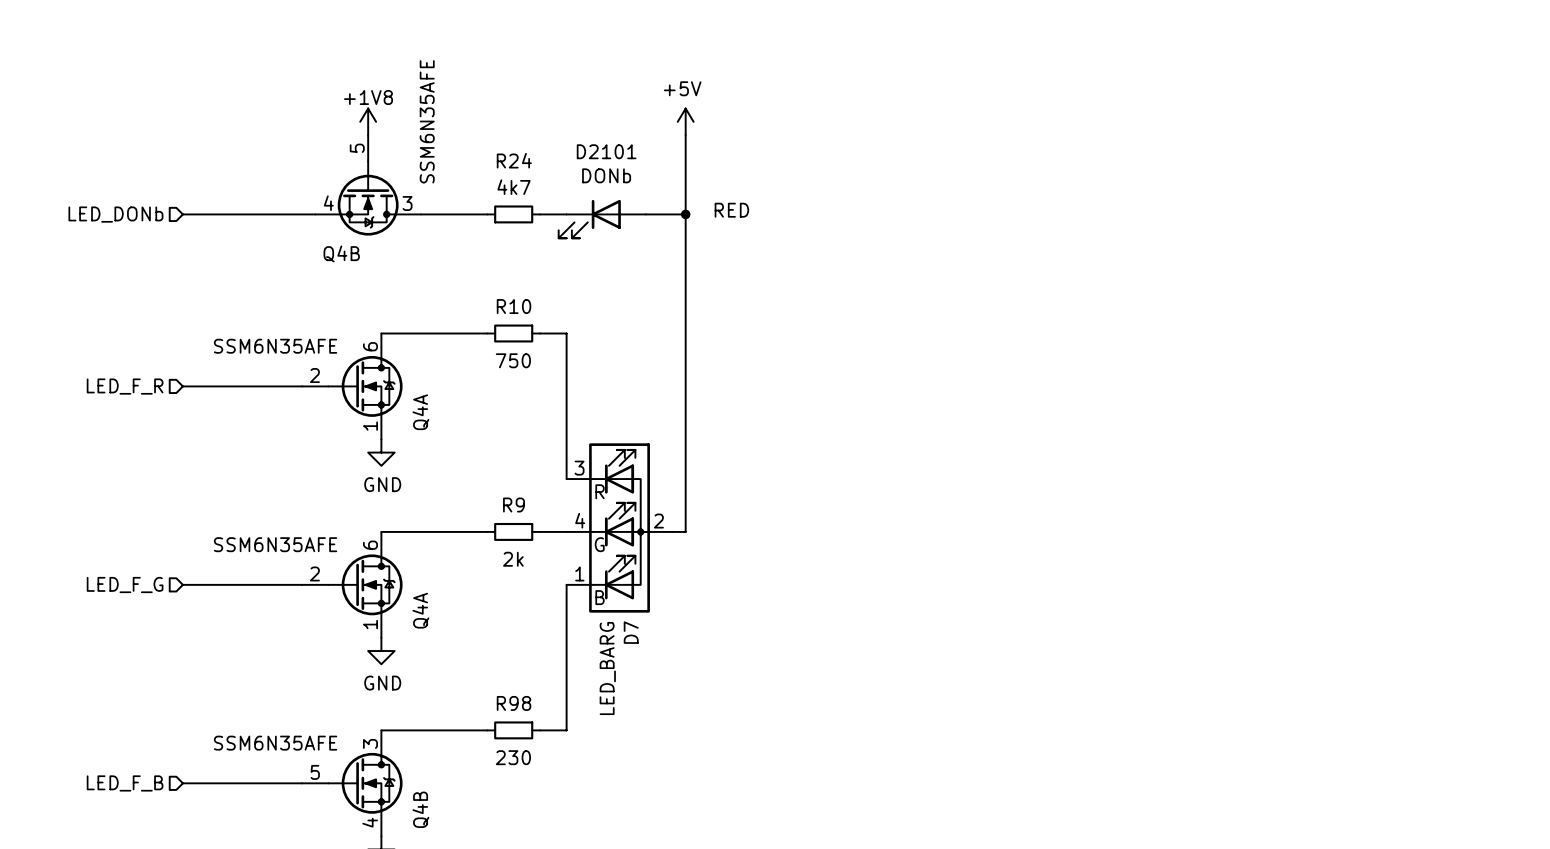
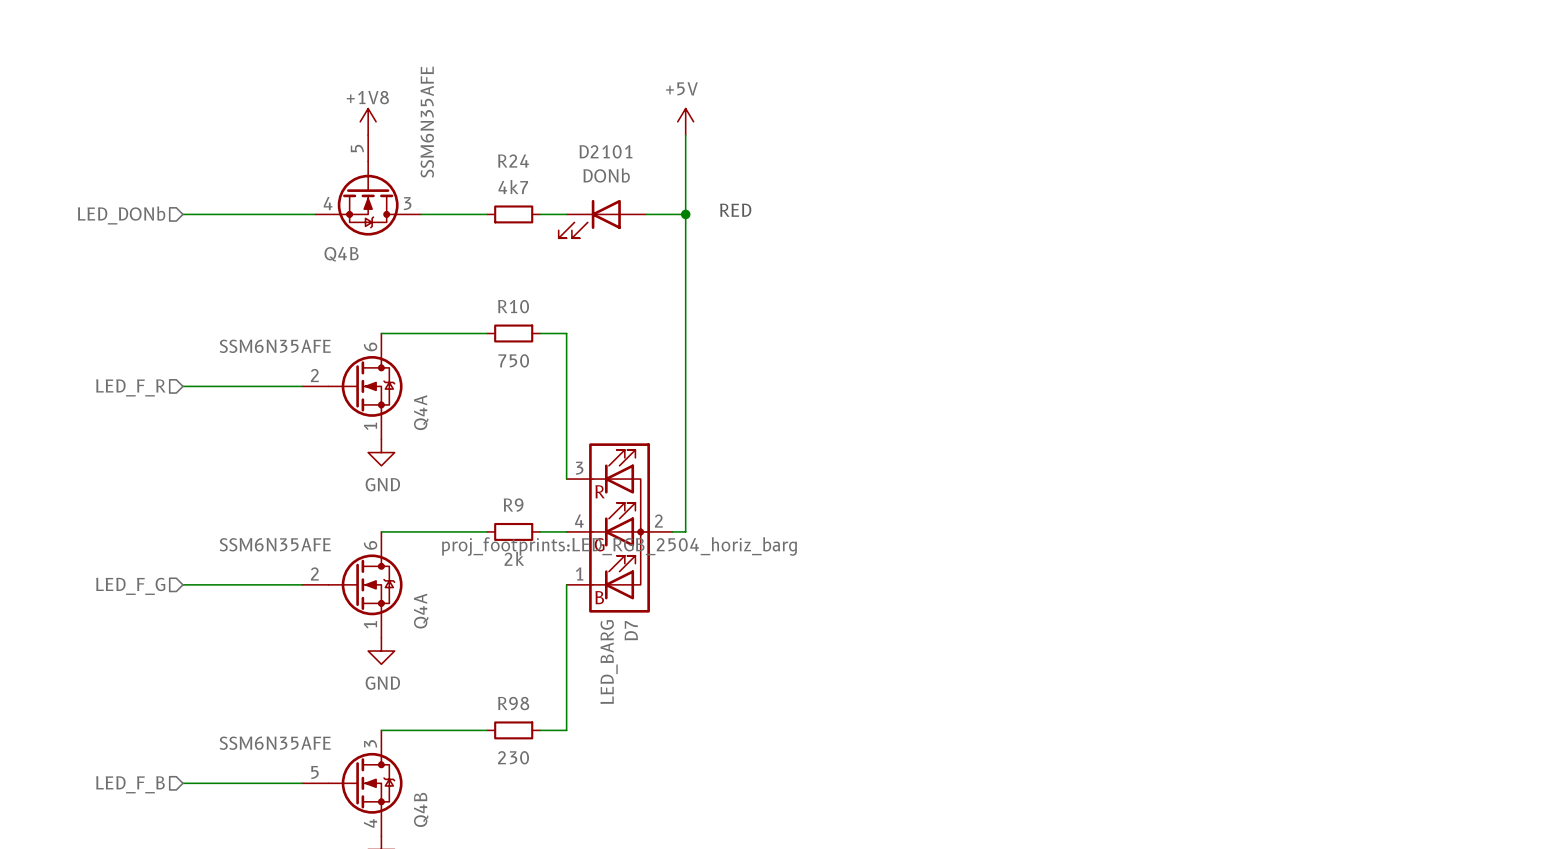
D7 text: none -> proj_footprints:LED_RGB_2504_horiz_barg (619, 546)

